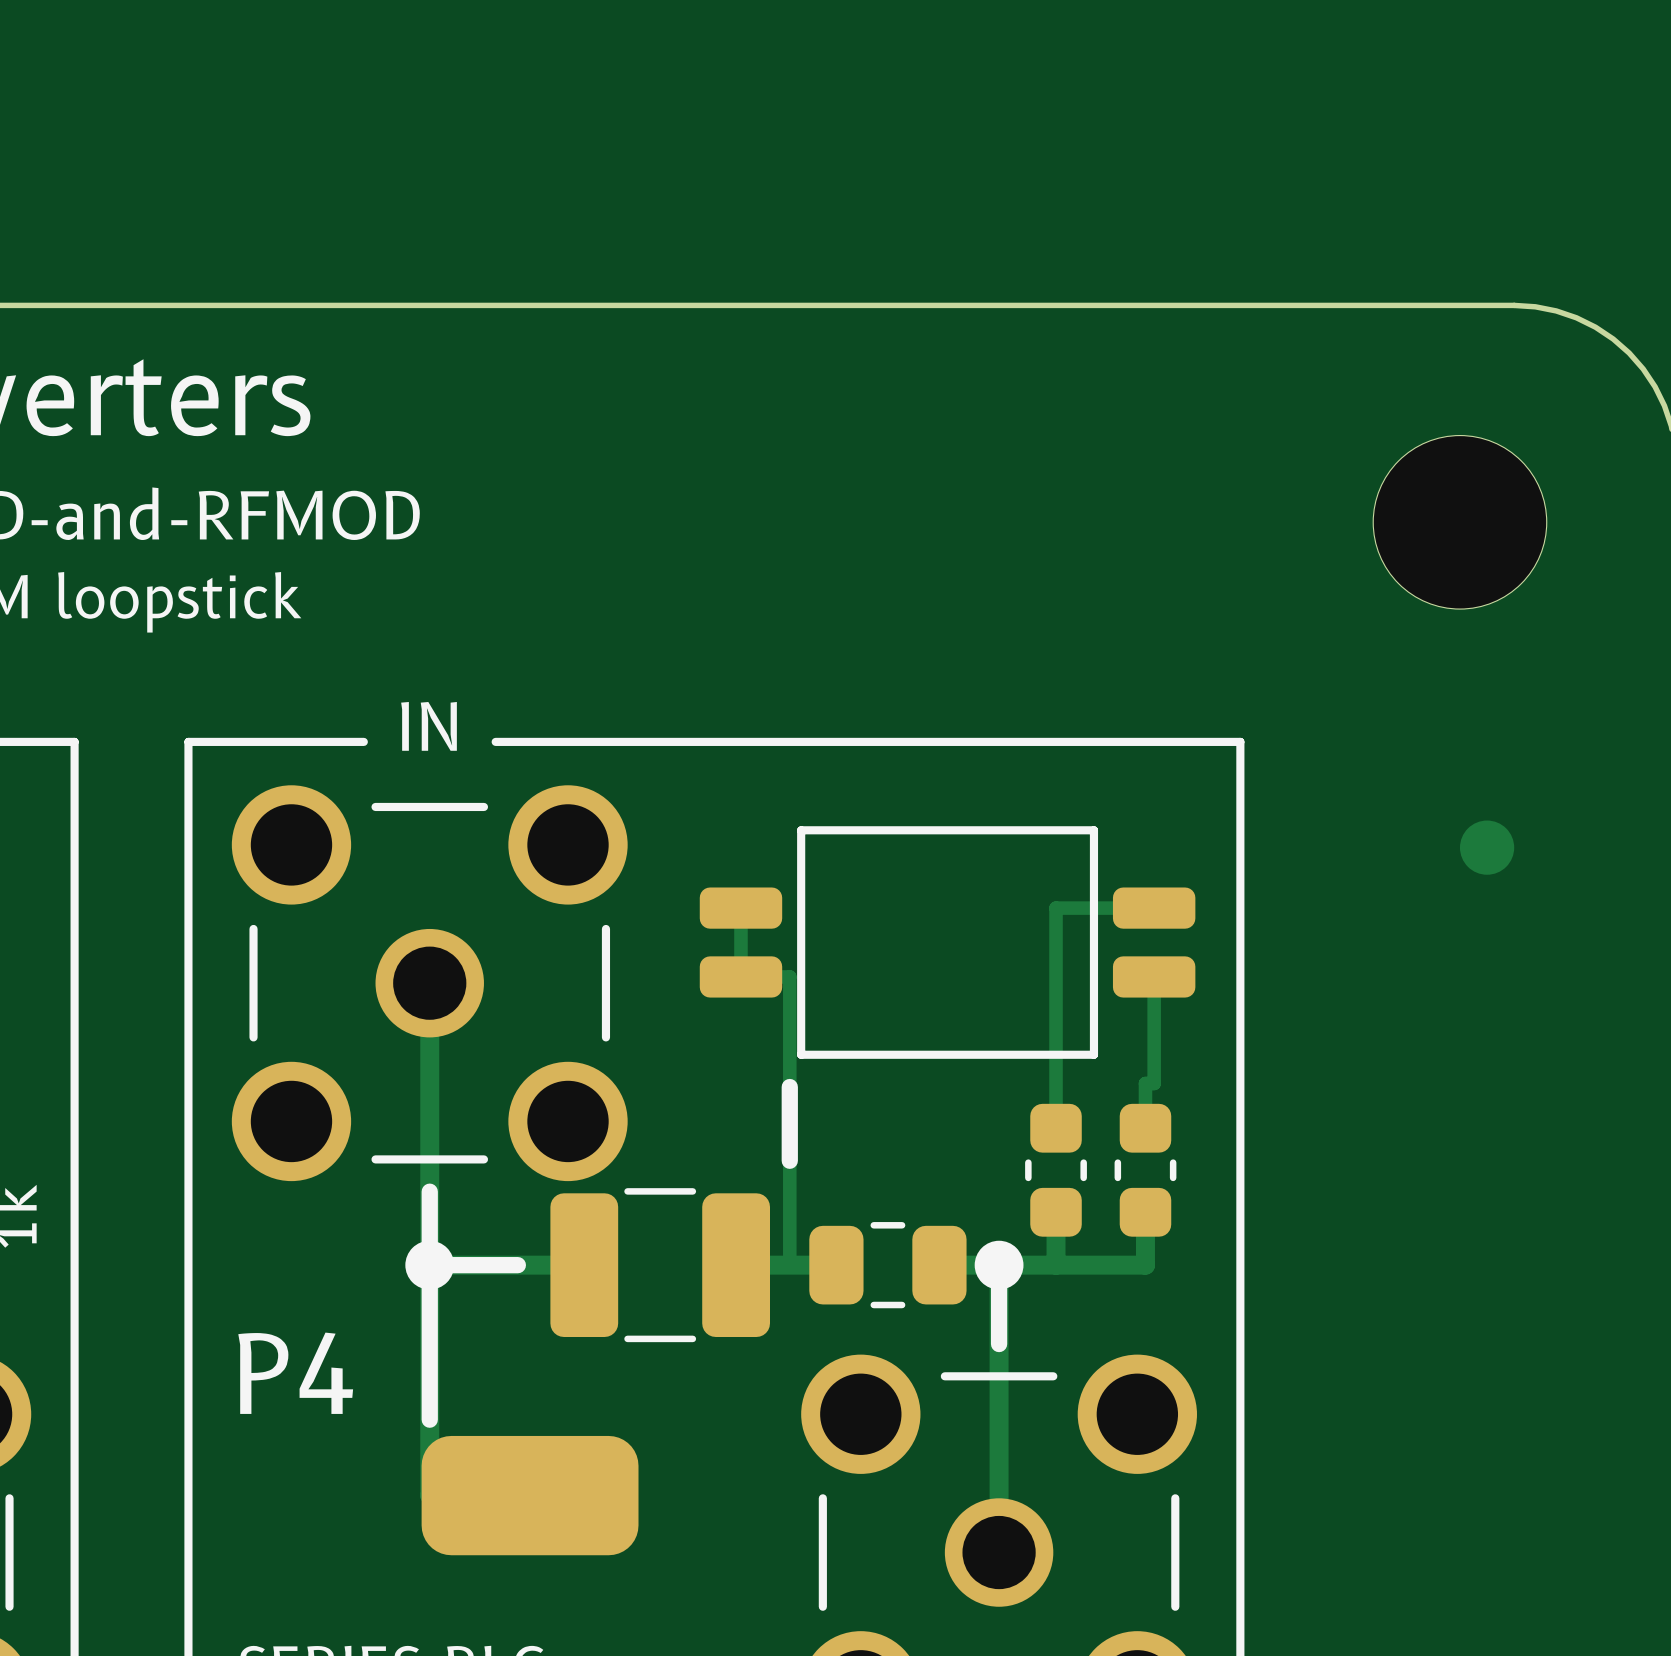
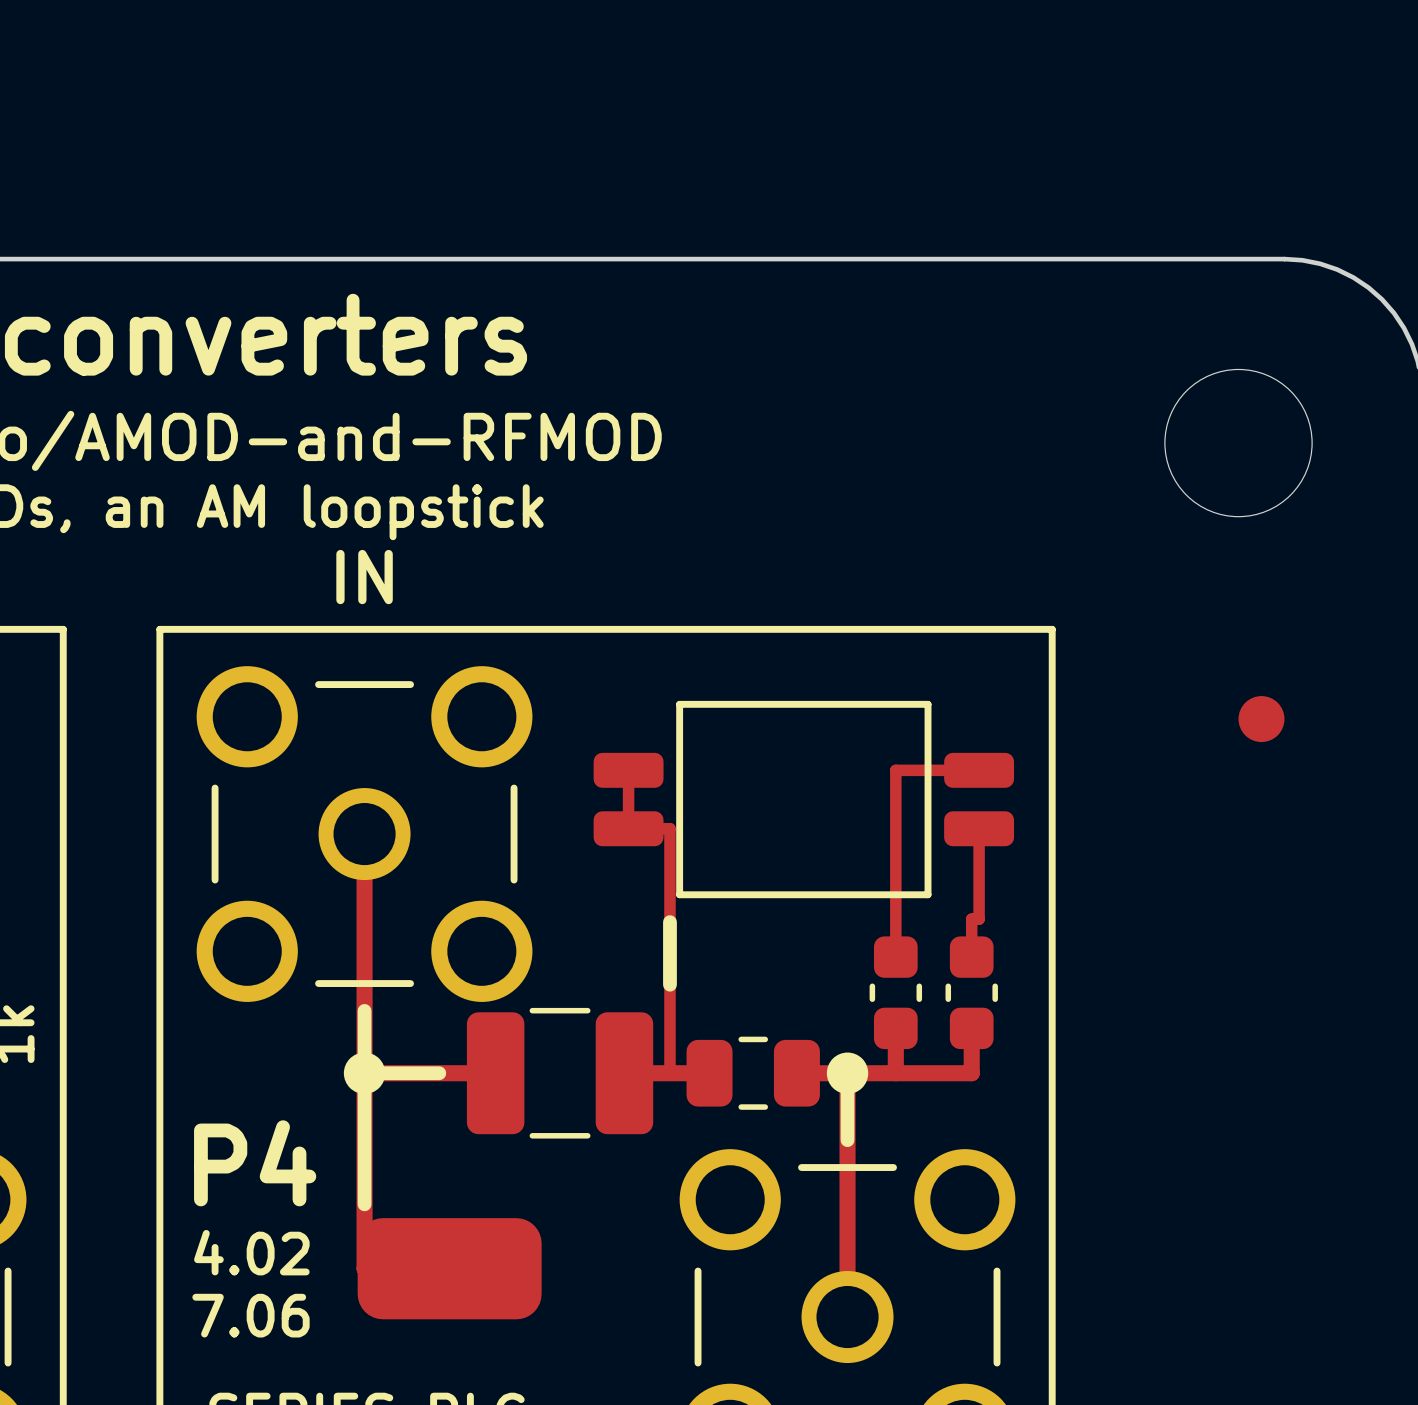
text position: IN (429, 726) -> IN (364, 577)
line: none -> (308, 629) (420, 629)
text: none -> 4.02 (251, 1252)
text: none -> 7.06 (250, 1315)

